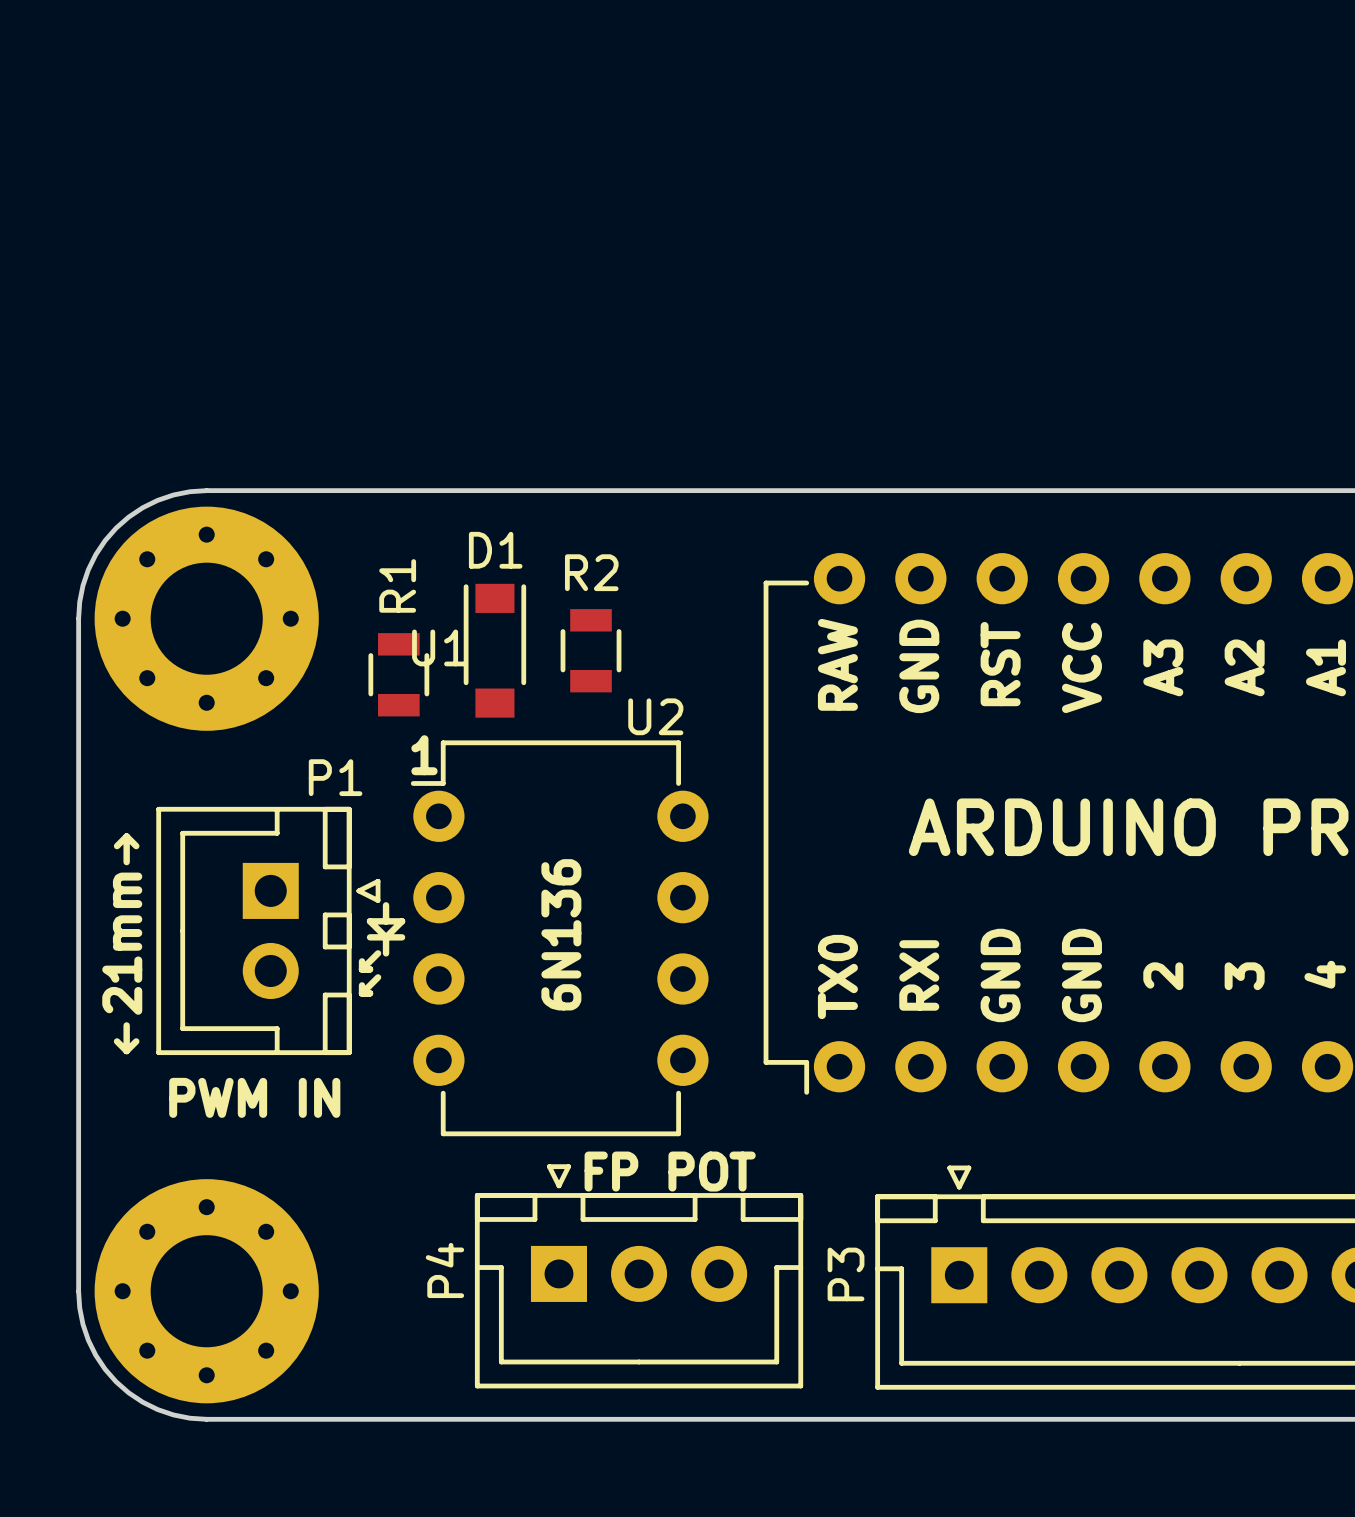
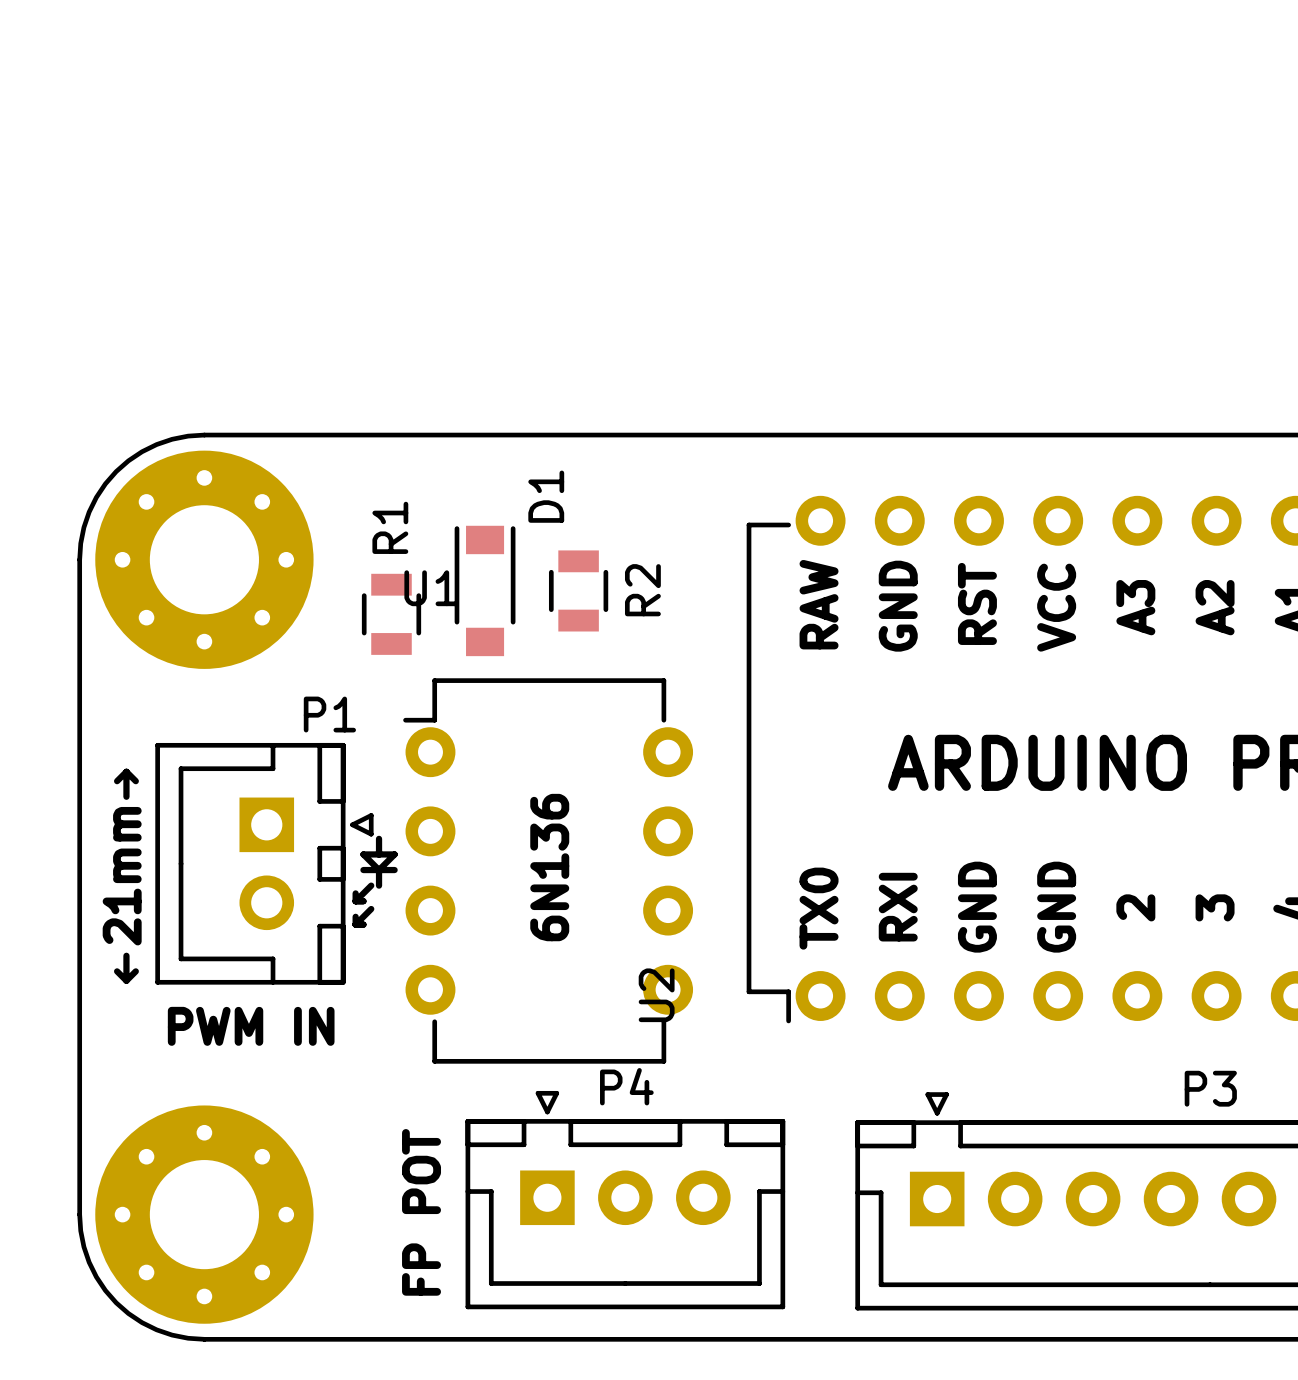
D1 name rotation: 0° (495, 550) -> 90° counterclockwise (546, 496)
R2 name rotation: 0° (591, 572) -> 90° counterclockwise (642, 590)
R2 name position: R2 (591, 572) -> R2 (642, 590)
U2 name rotation: 0° (655, 716) -> 90° counterclockwise (656, 995)
U2 name position: U2 (655, 716) -> U2 (656, 995)
text: 1 (424, 755) -> none
text rotation: 0° (670, 1171) -> 90° counterclockwise (421, 1212)
text position: FP POT (670, 1171) -> FP POT (421, 1212)
P4 name rotation: 0° (444, 1270) -> 90° clockwise (626, 1086)
P4 name position: P4 (444, 1270) -> P4 (626, 1086)
P3 name rotation: 0° (846, 1274) -> 90° clockwise (1210, 1088)
P3 name position: P3 (846, 1274) -> P3 (1210, 1088)

